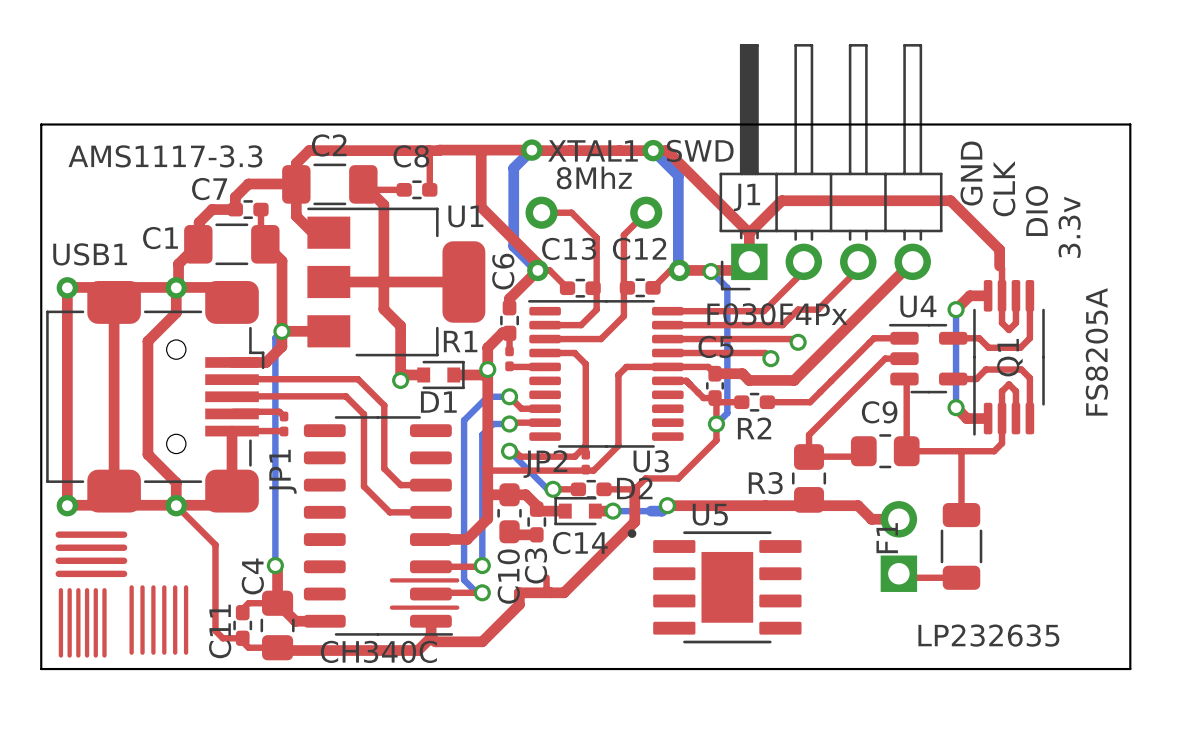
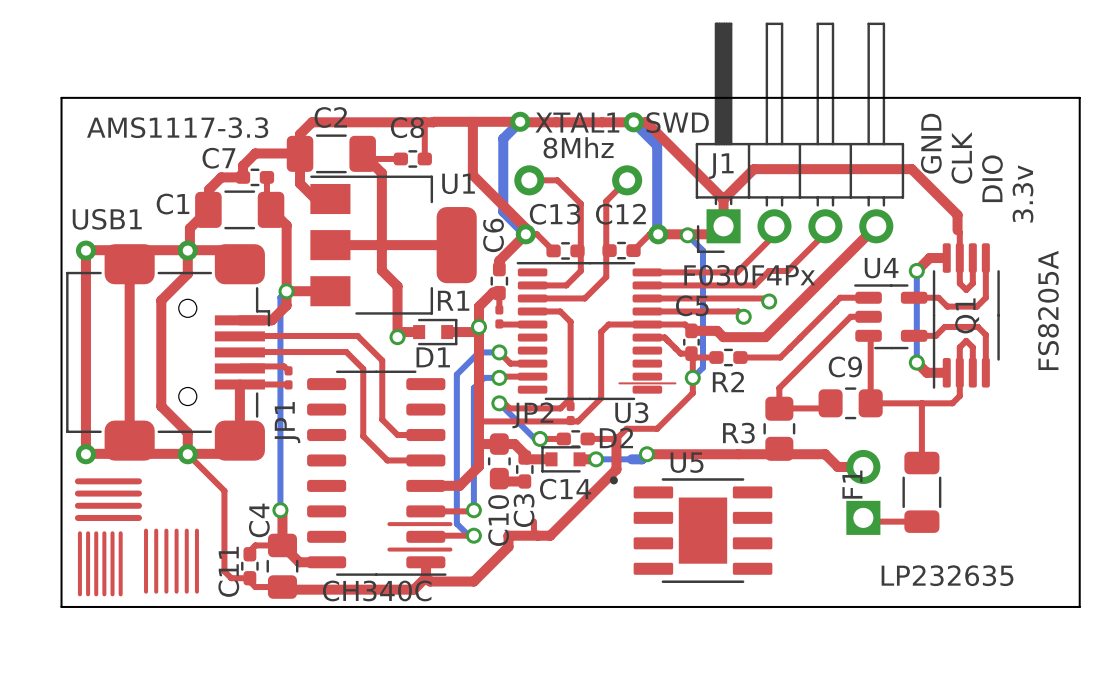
top track: none -> (619, 383) (675, 383)

